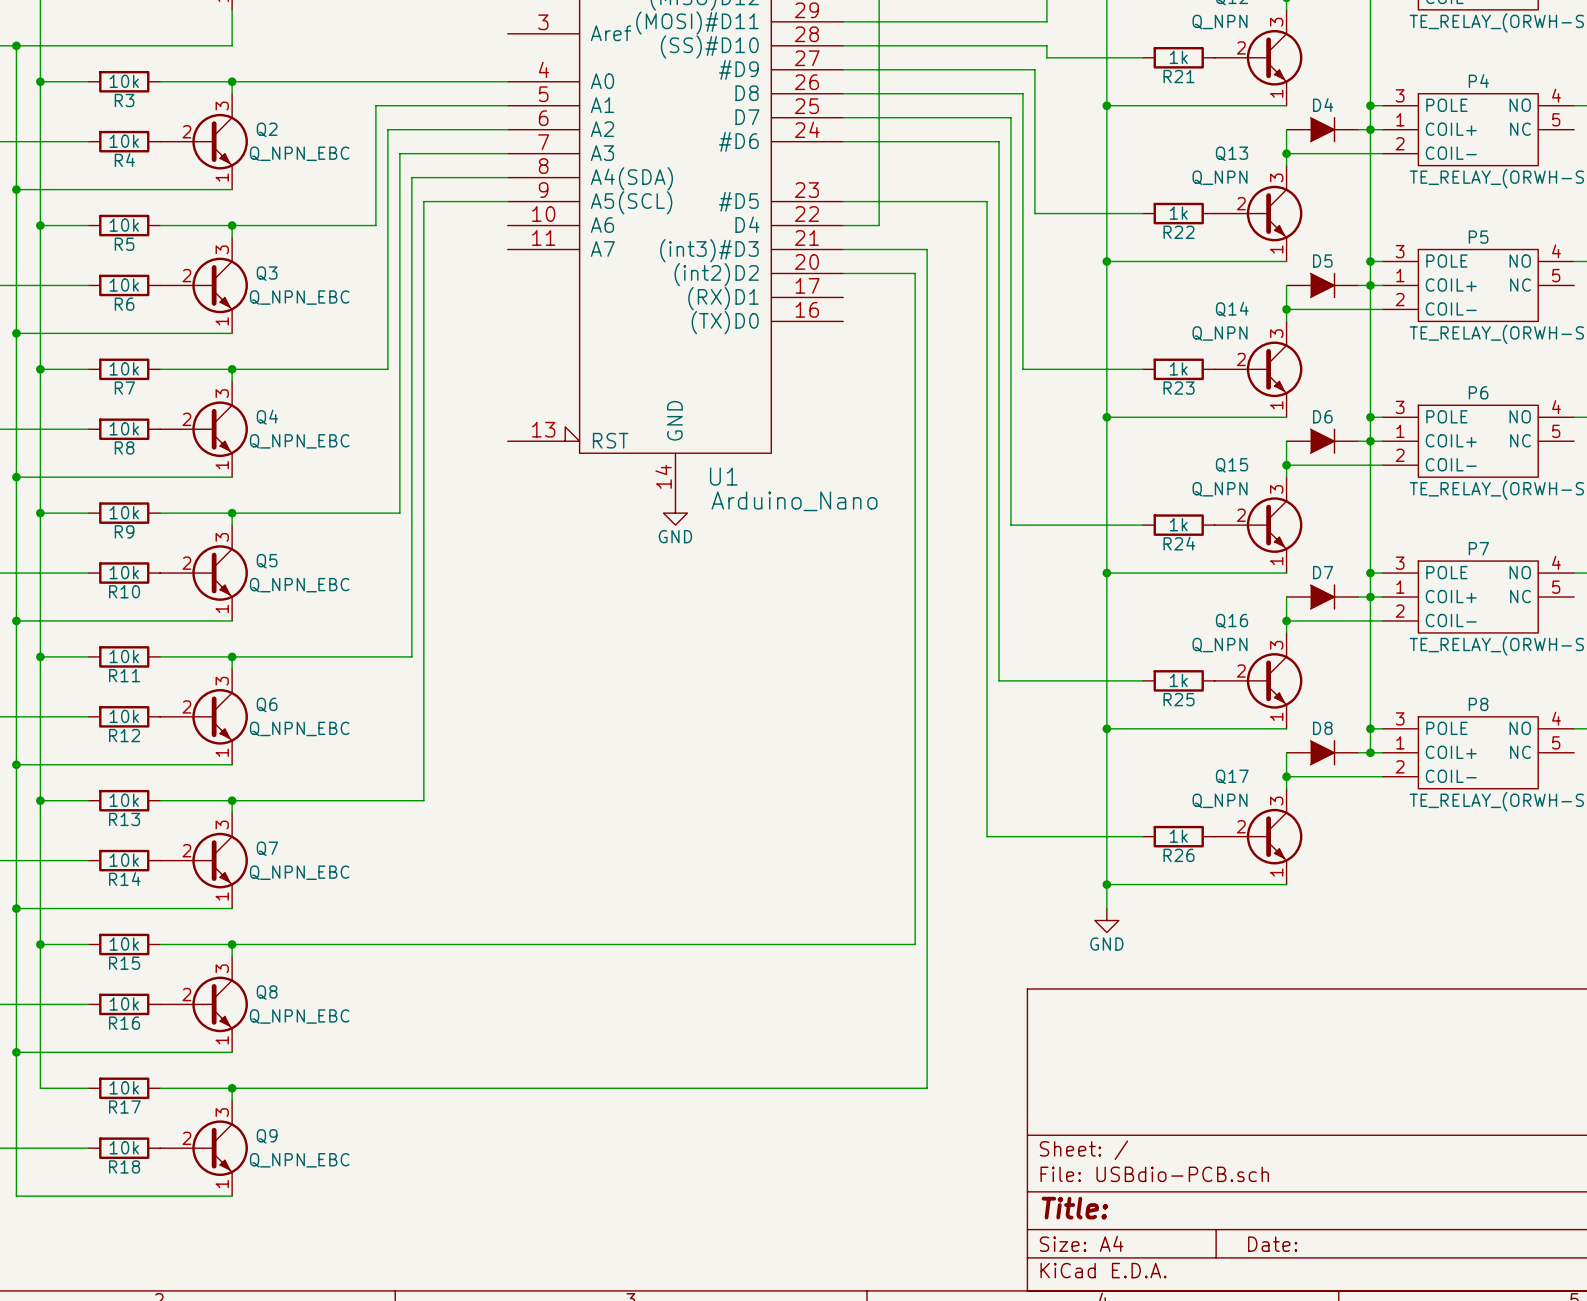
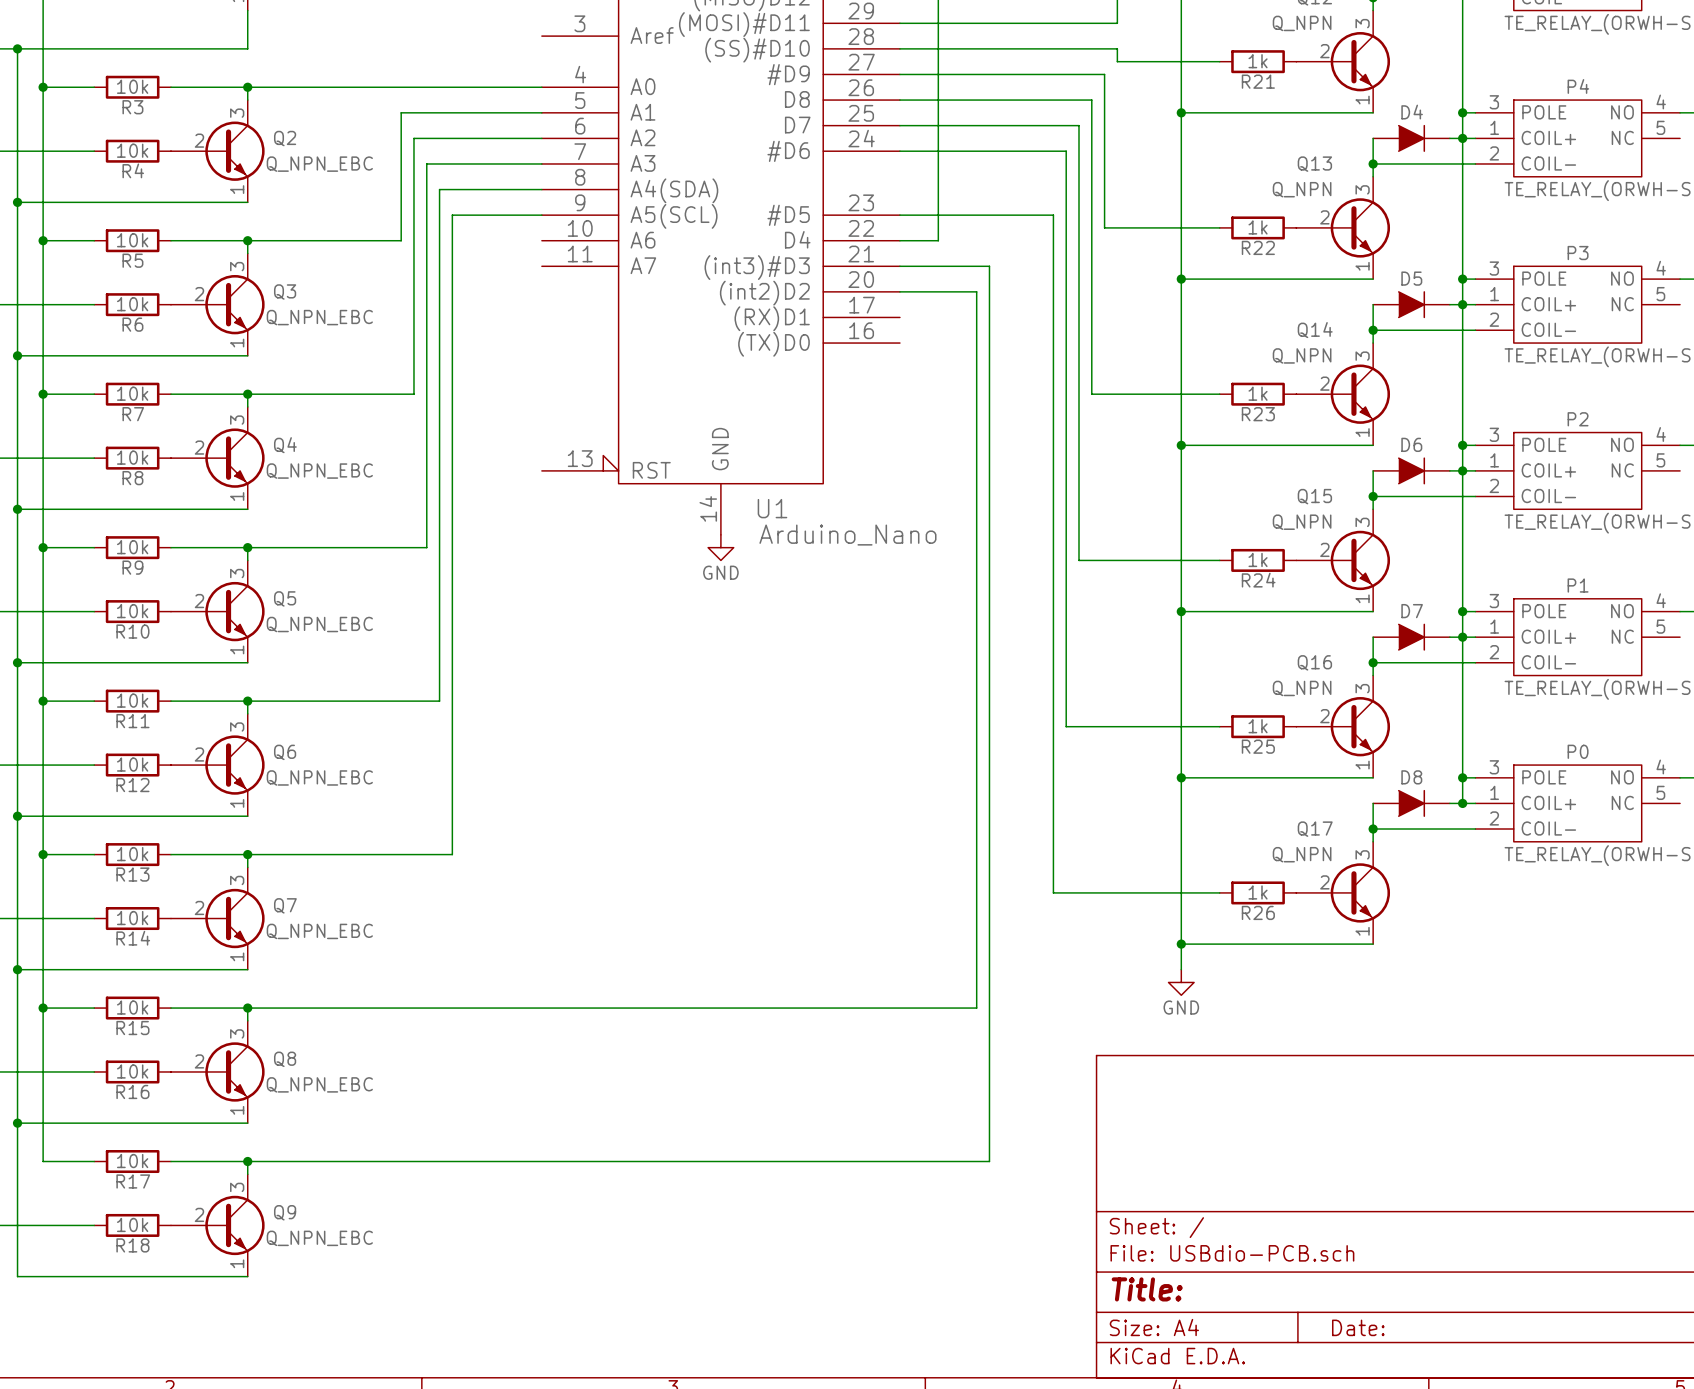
P5 name: P5 (1478, 237) -> P3 (1578, 253)
P6 name: P6 (1478, 392) -> P2 (1578, 419)
P7 name: P7 (1478, 548) -> P1 (1578, 585)
P8 name: P8 (1478, 704) -> P0 (1578, 751)

